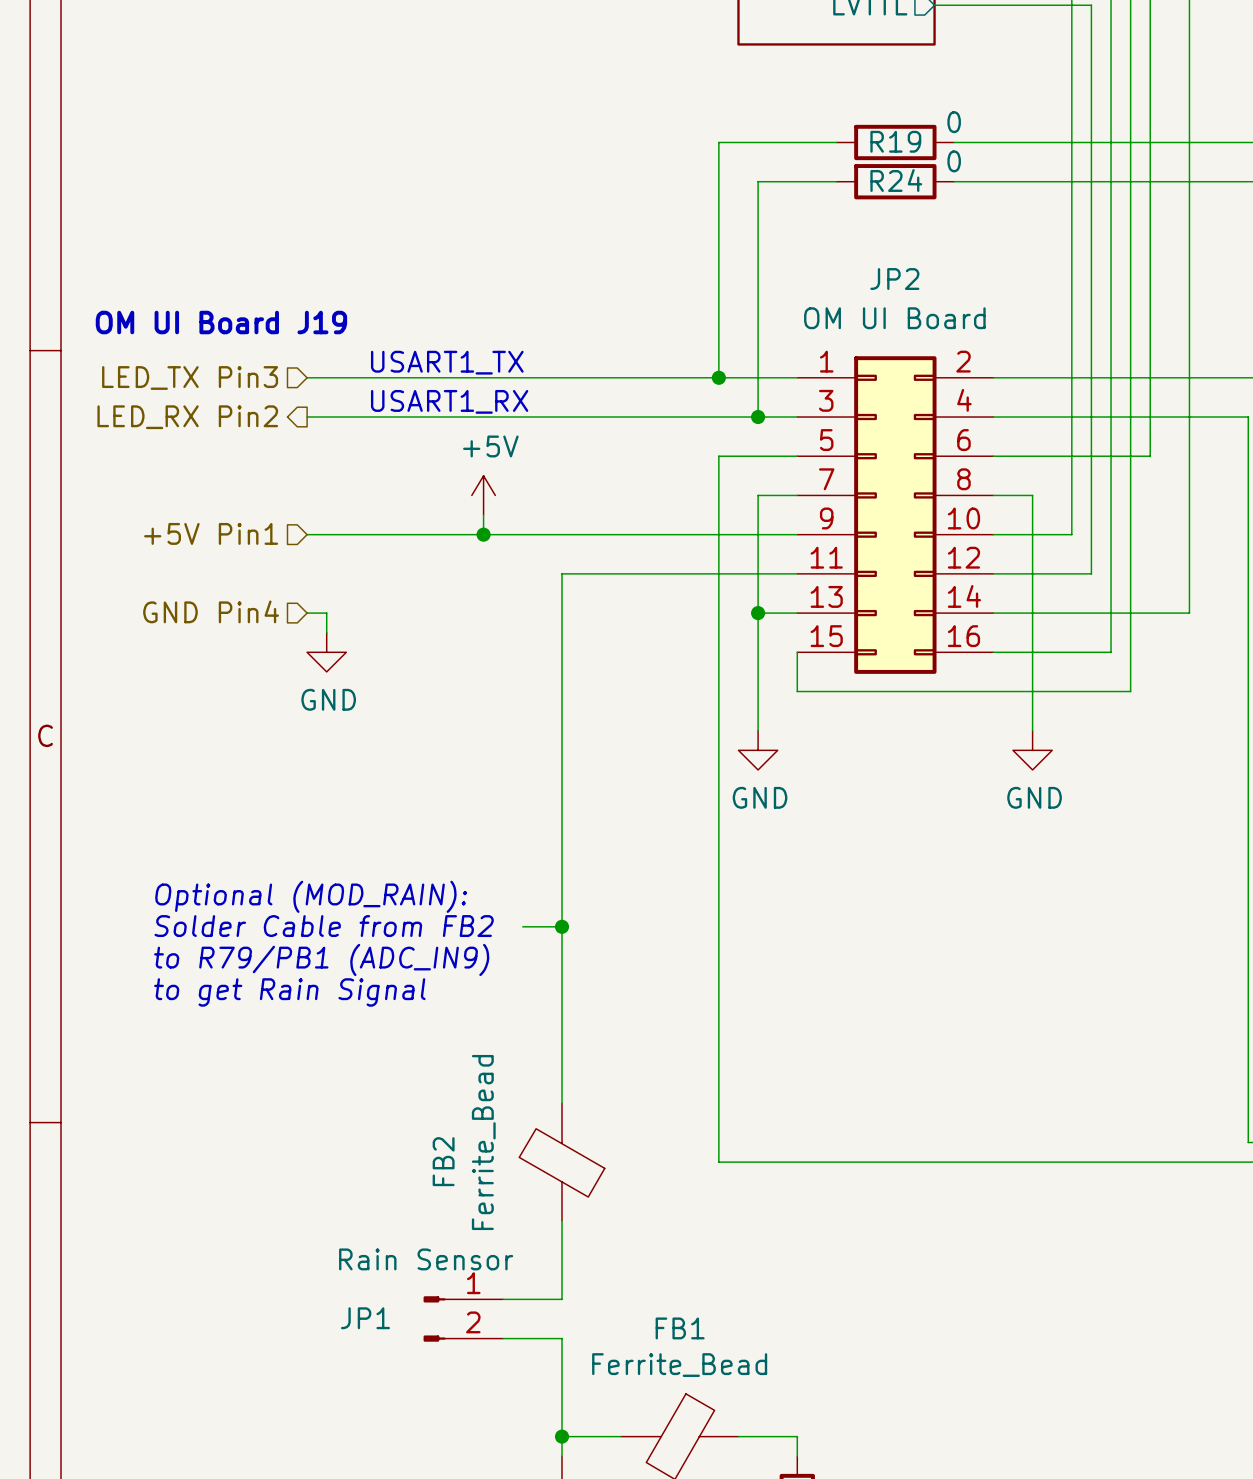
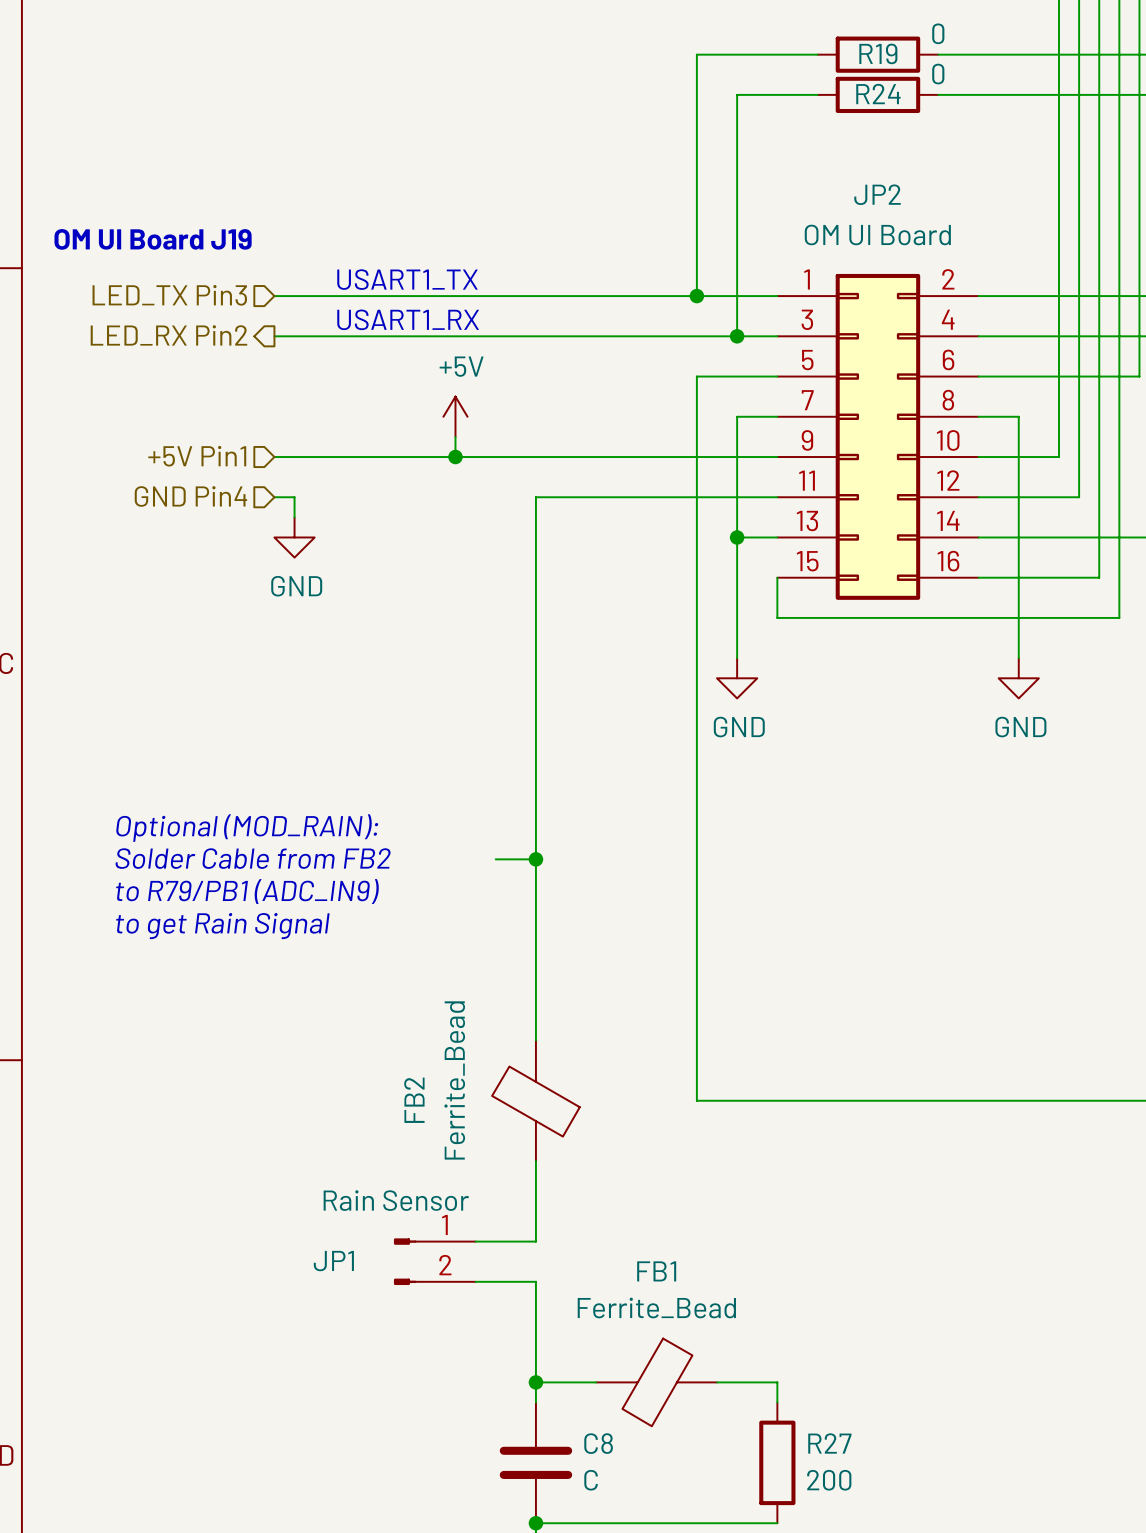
hierarchical label position: GND Pin4 (211, 611) -> GND Pin4 (190, 496)
wire: (307, 613) (326, 613) (326, 632) -> (274, 497) (294, 497) (294, 517)
power symbol position: GND (326, 652) -> GND (294, 537)

